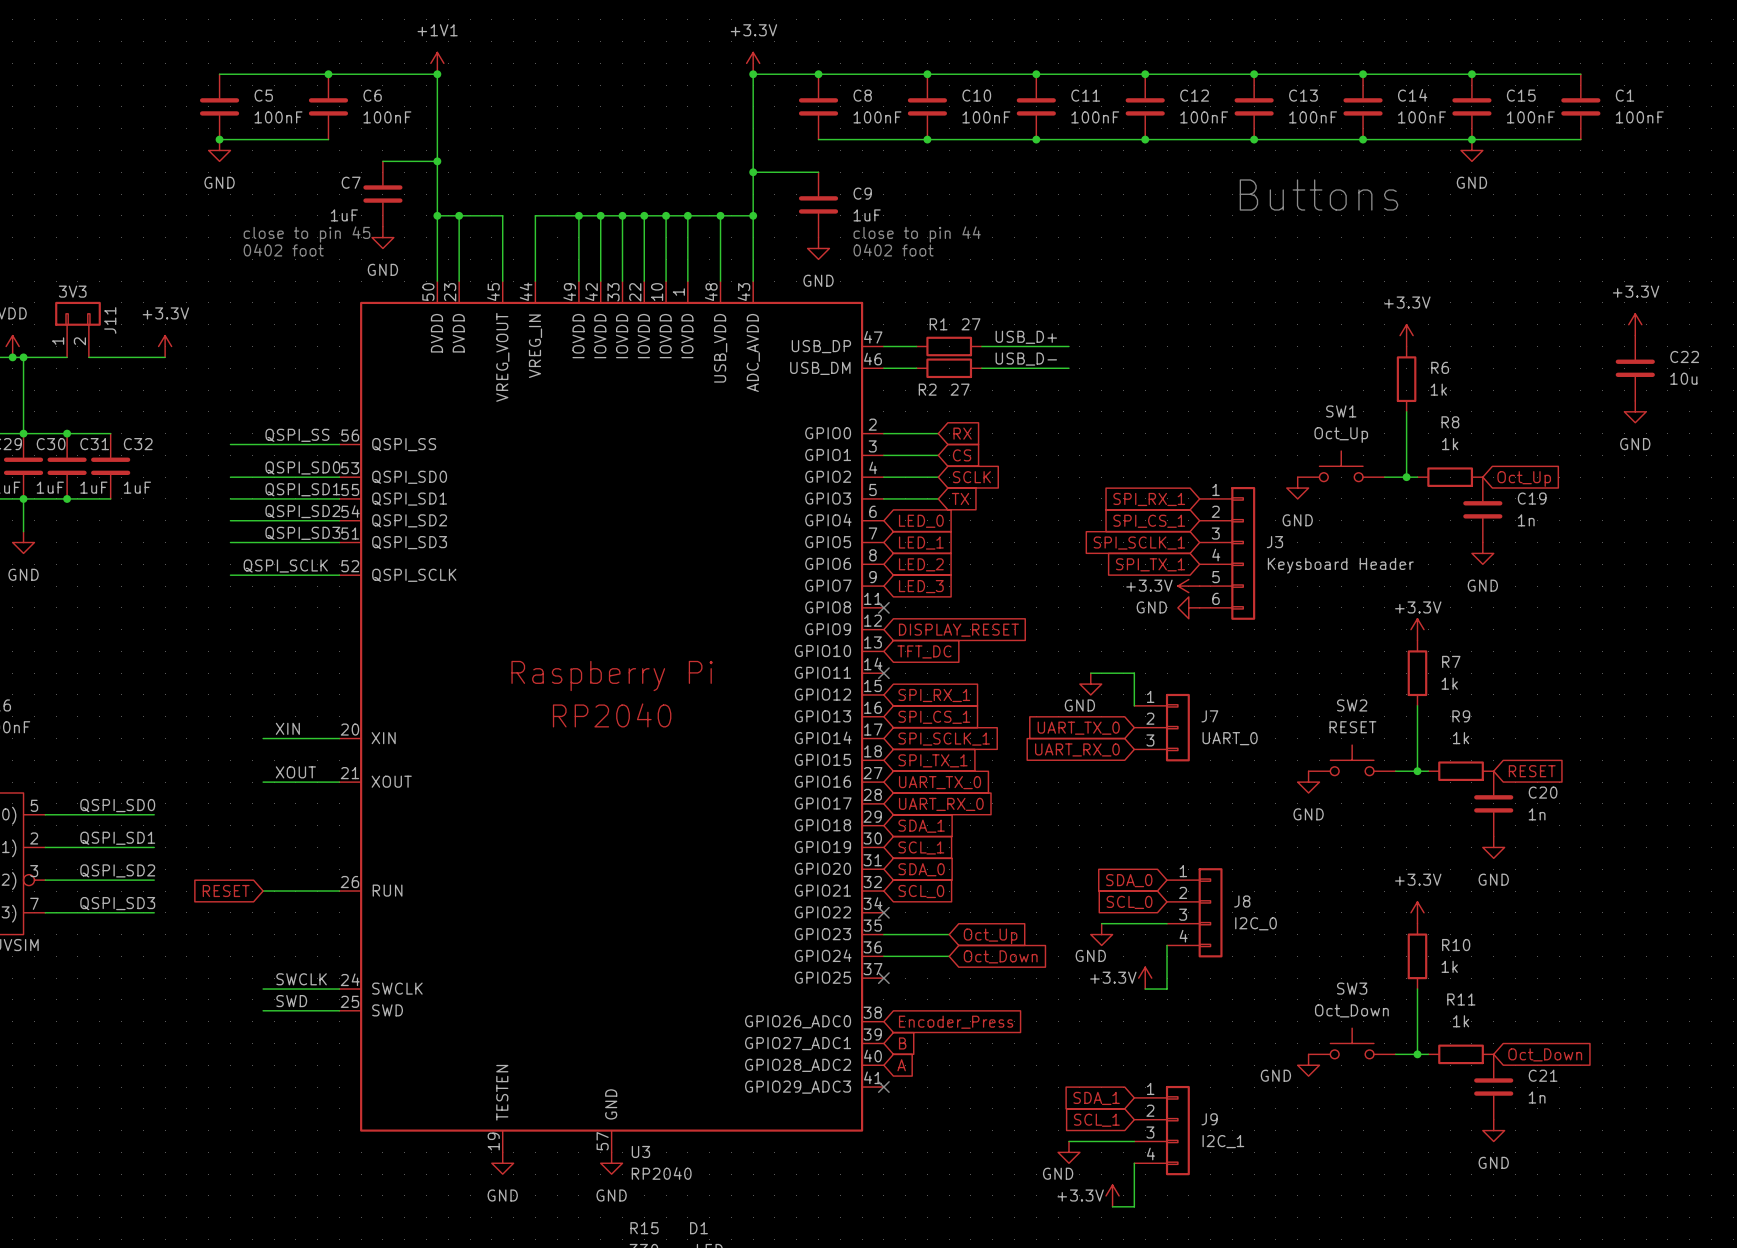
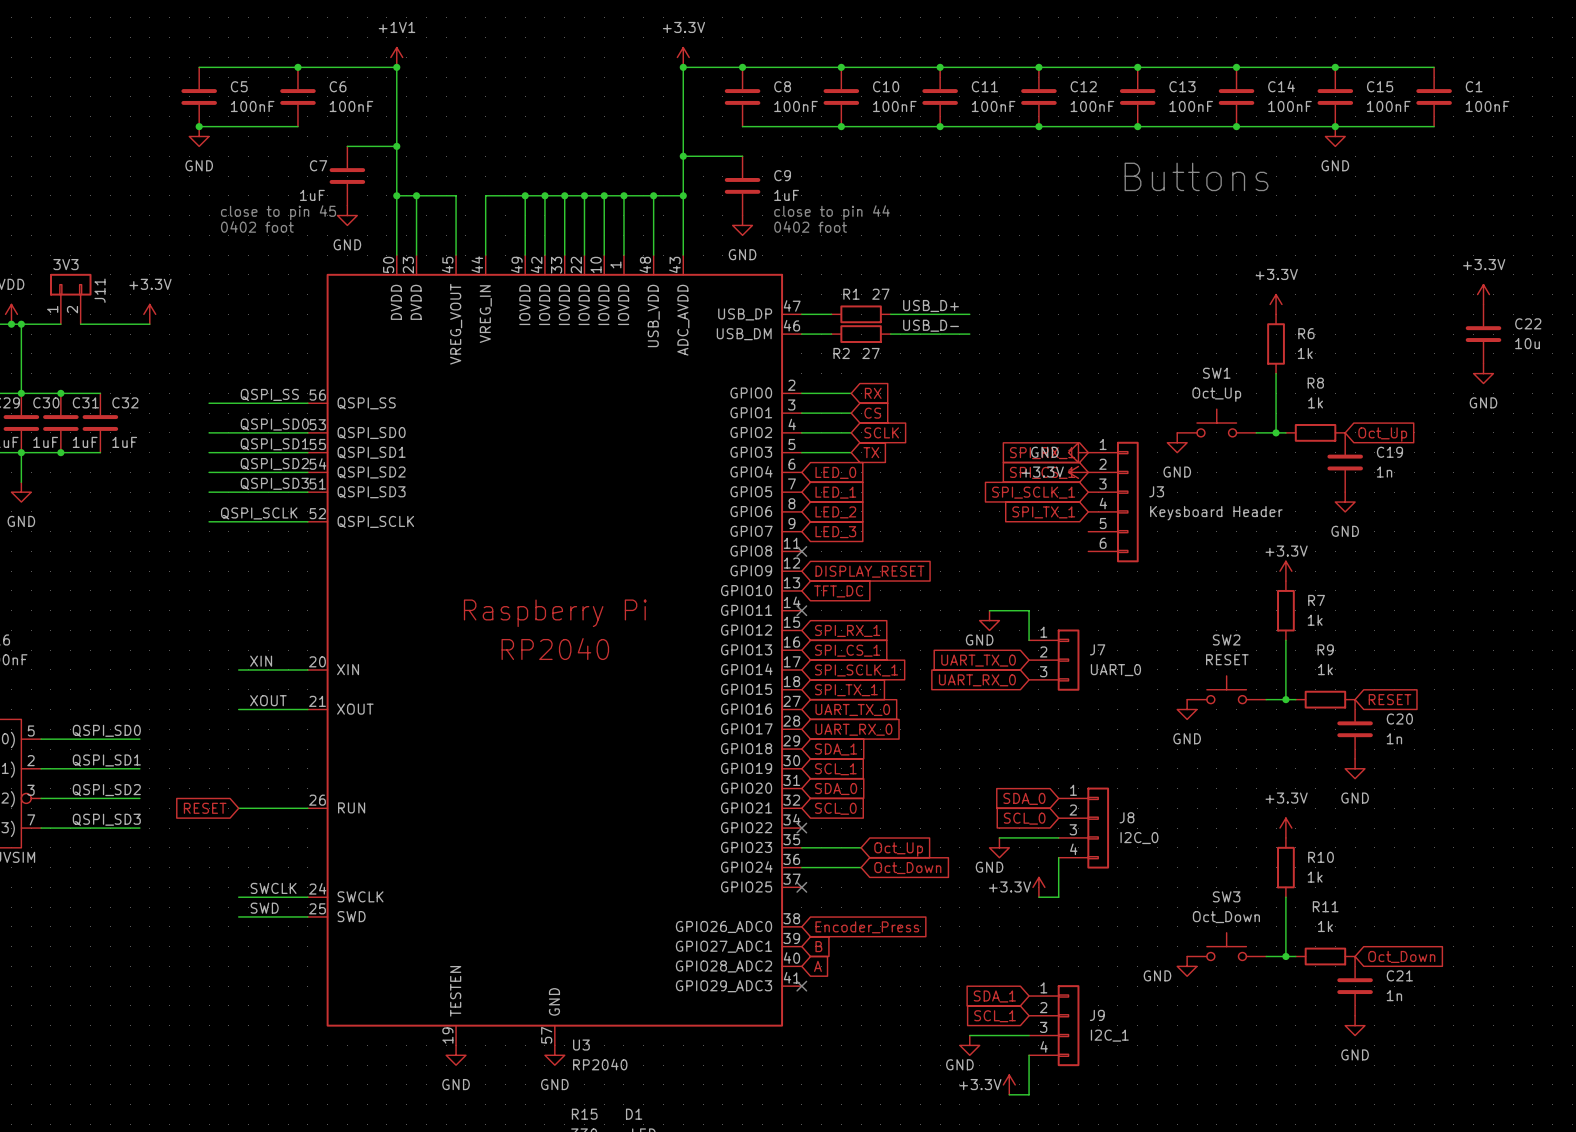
power symbol position: +3.3V (1188, 586) -> +3.3V (1078, 472)
power symbol position: GND (1188, 607) -> GND (1078, 452)

